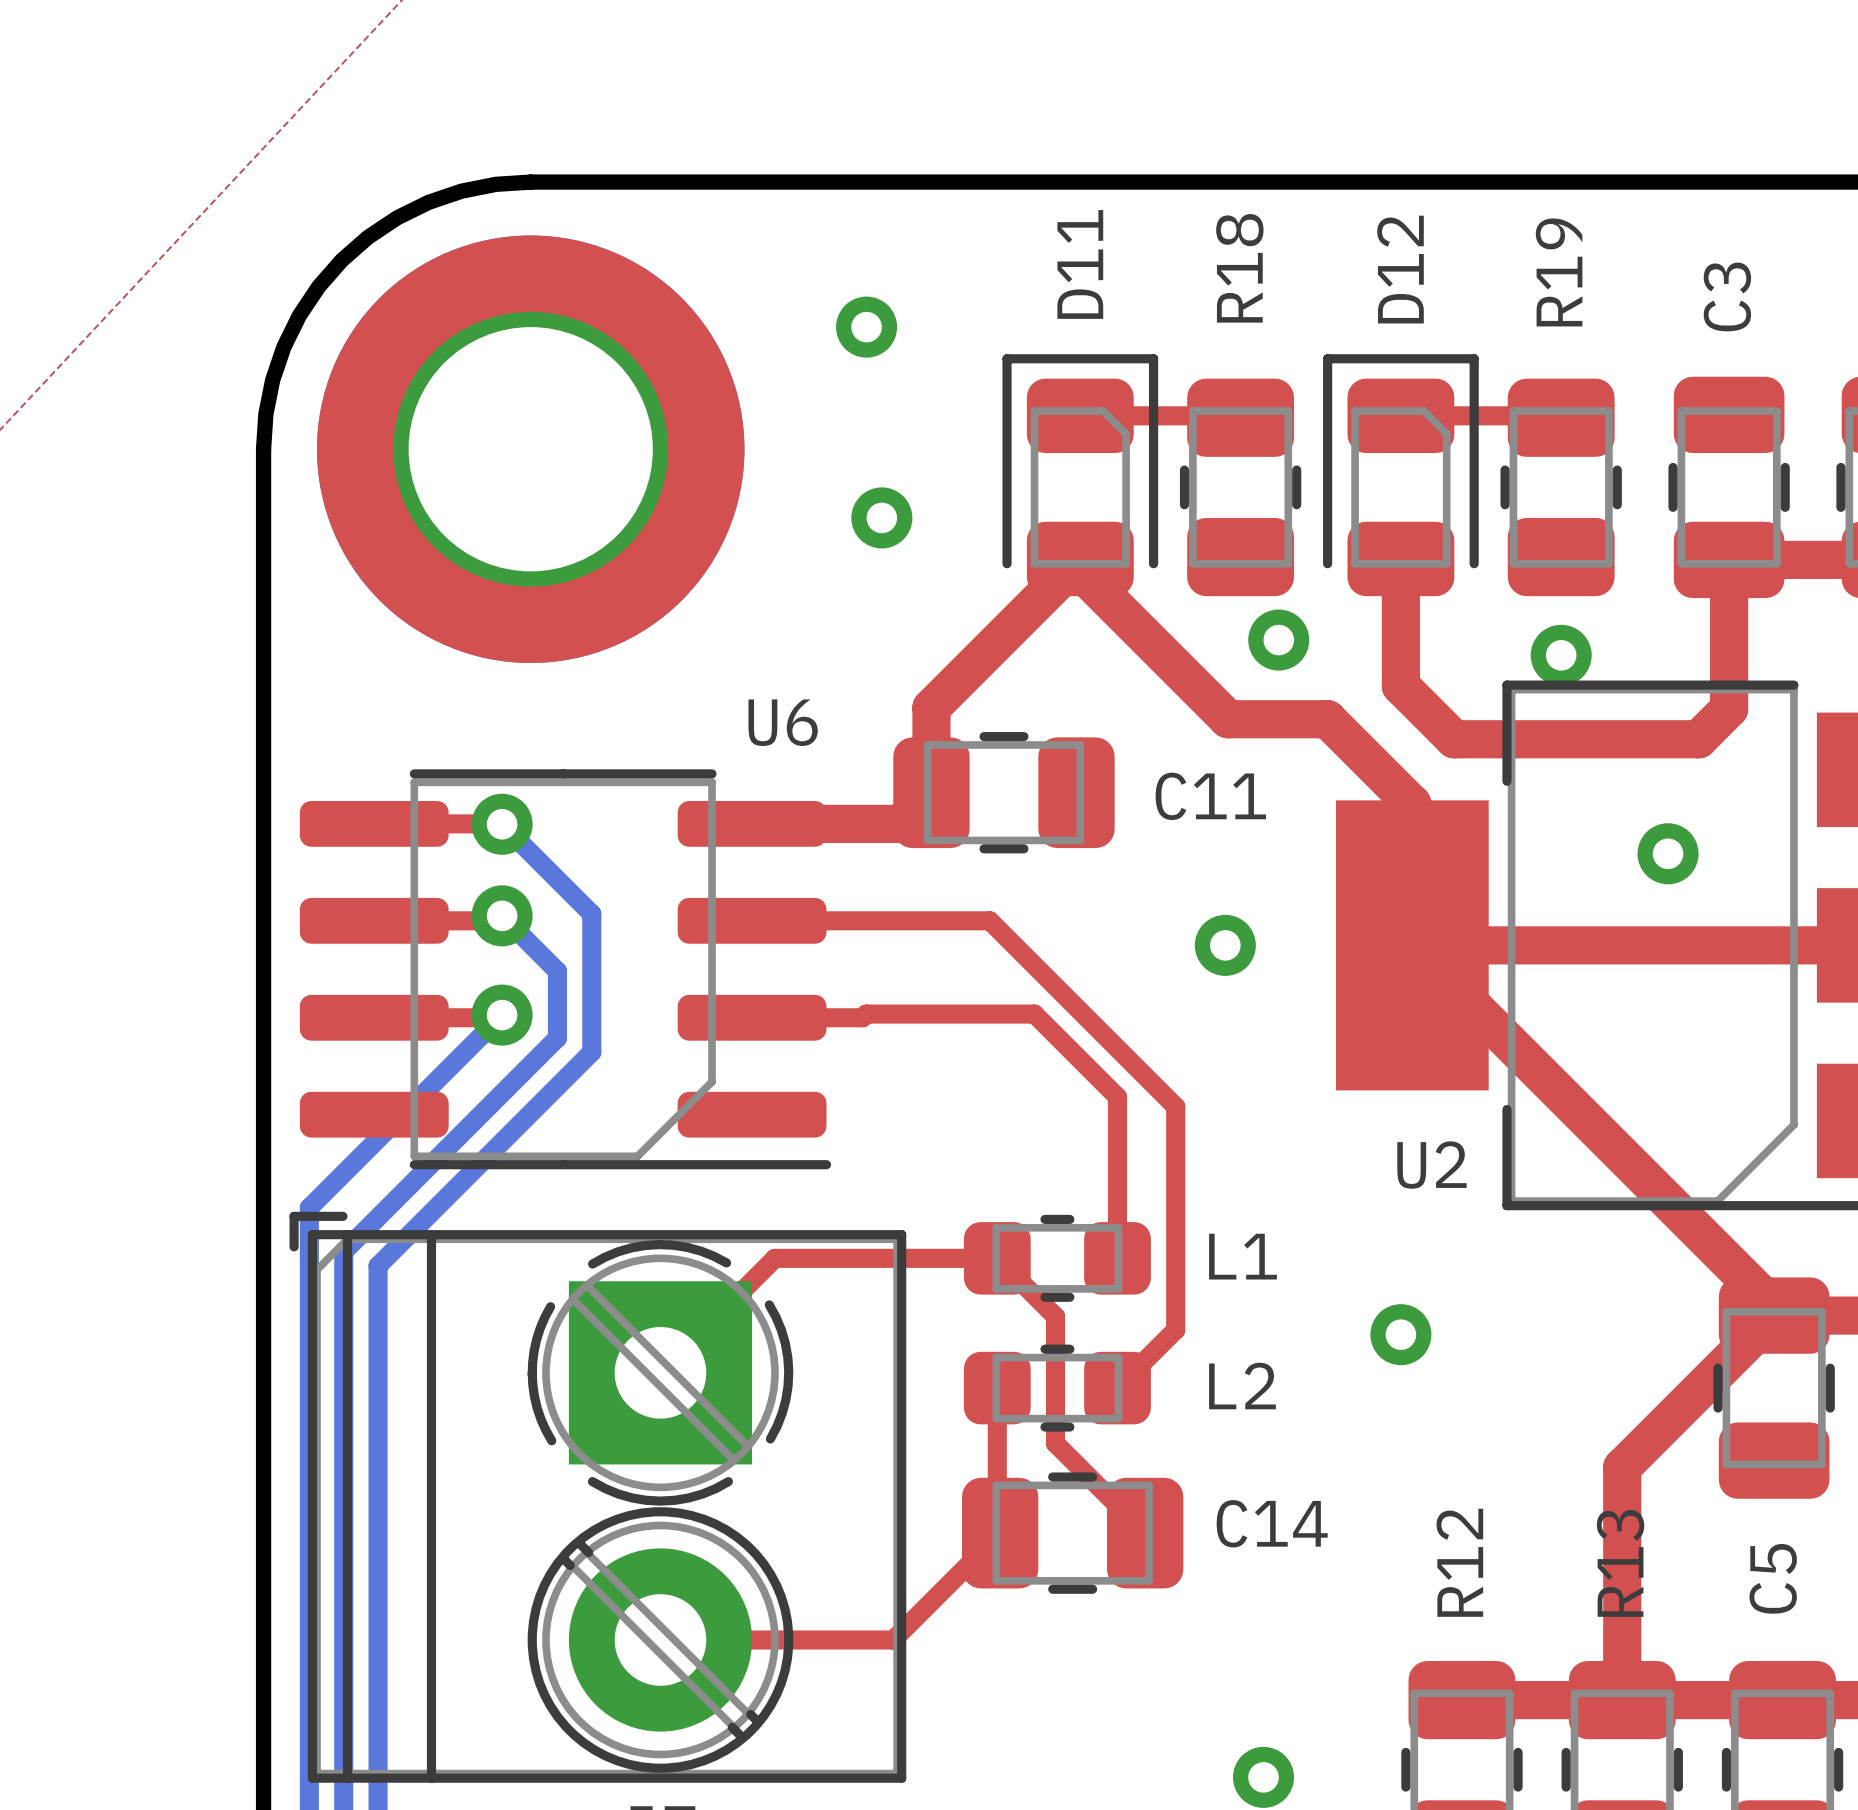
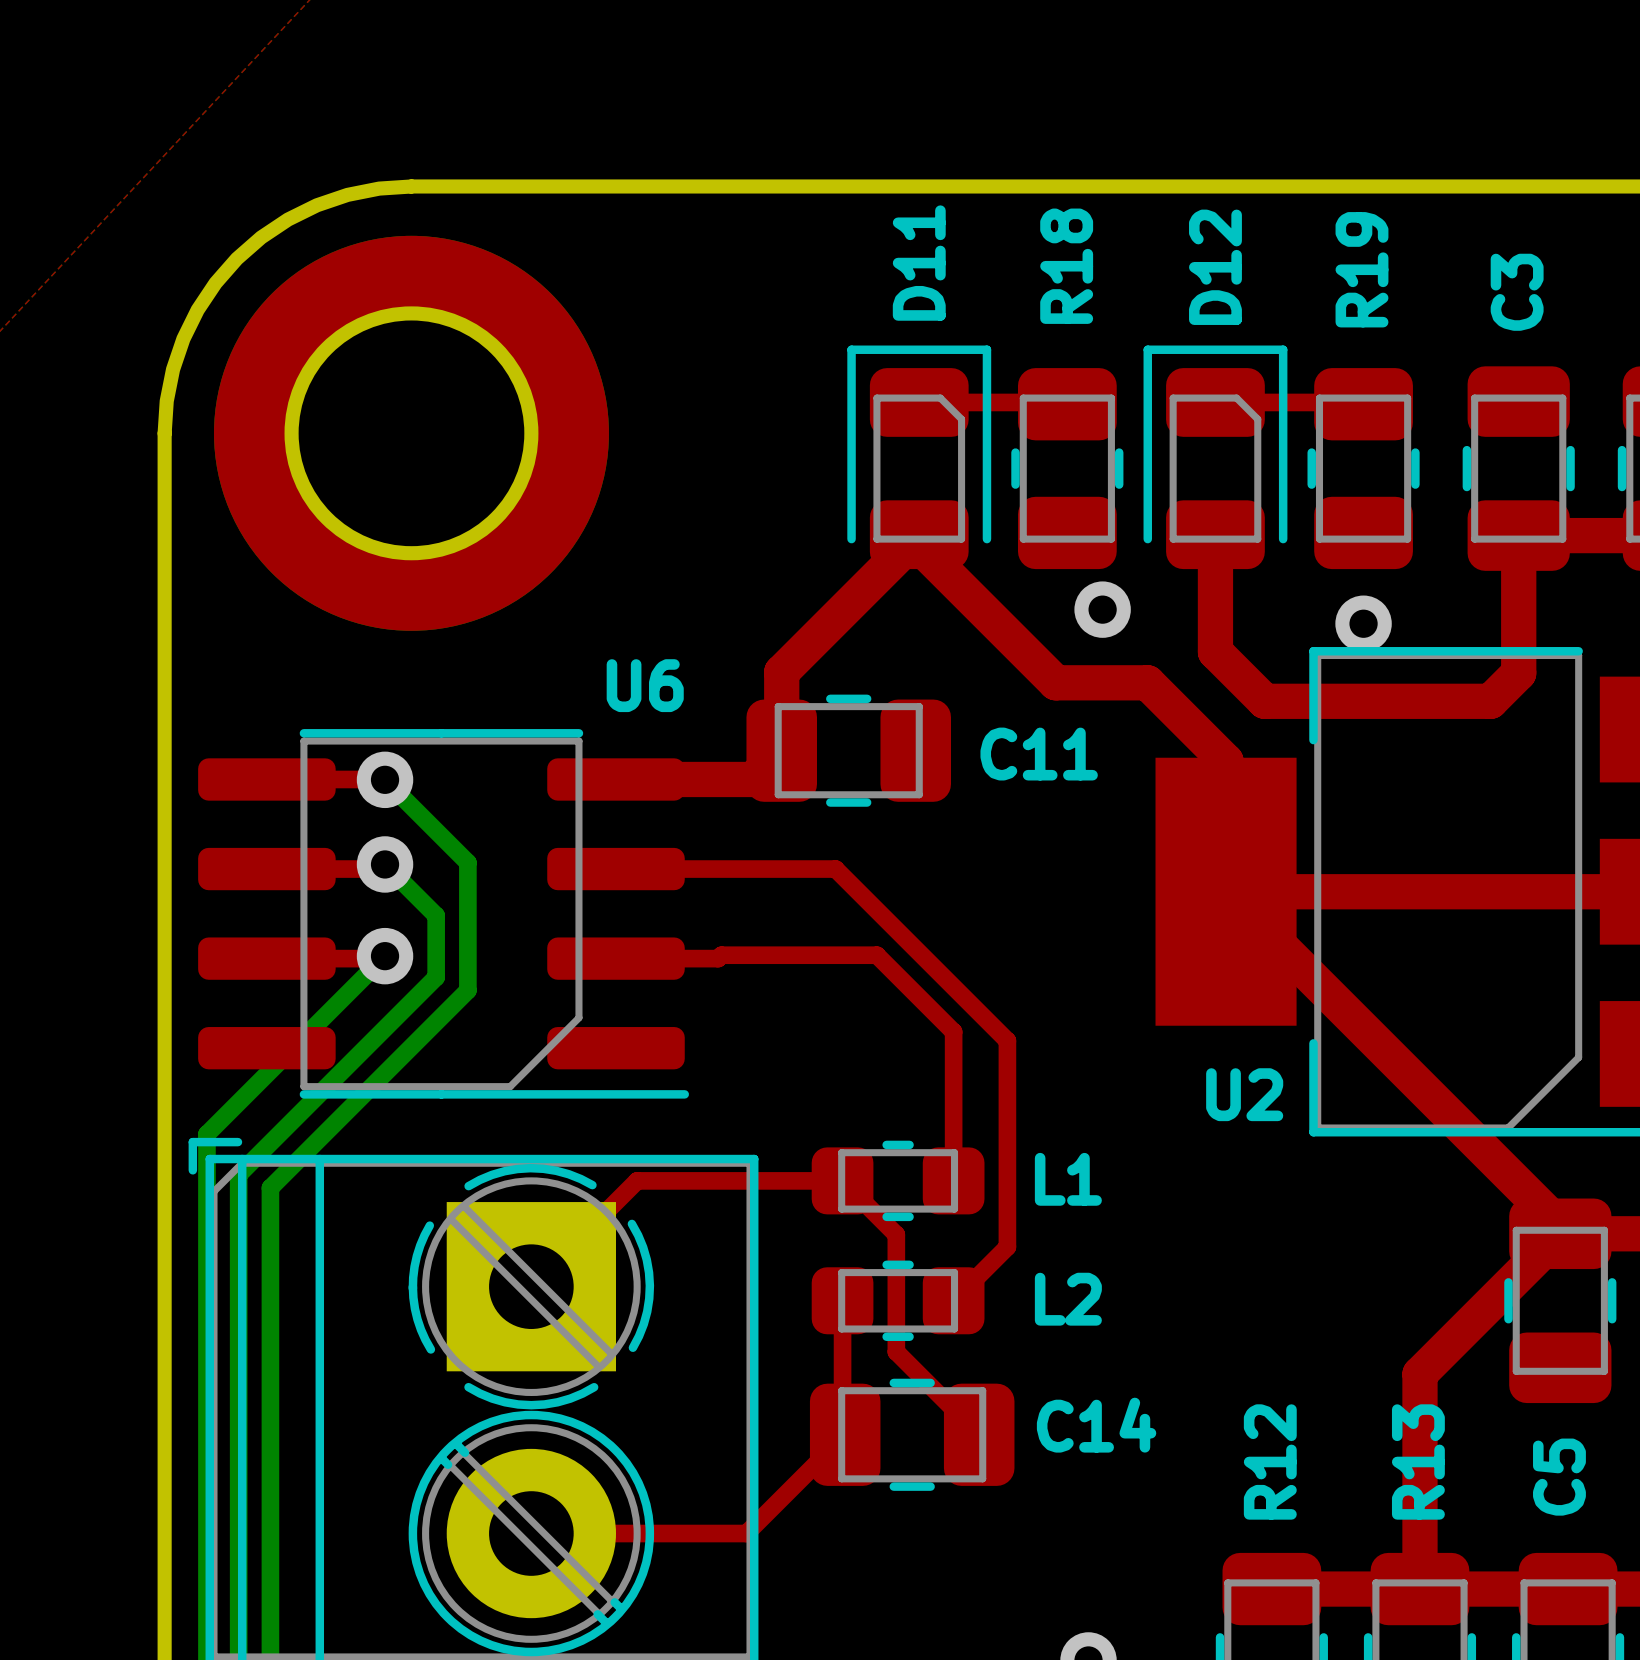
via: (866, 327) -> none
via: (881, 517) -> none
via: (1668, 853) -> none
via: (1225, 945) -> none
via: (1400, 1334) -> none

